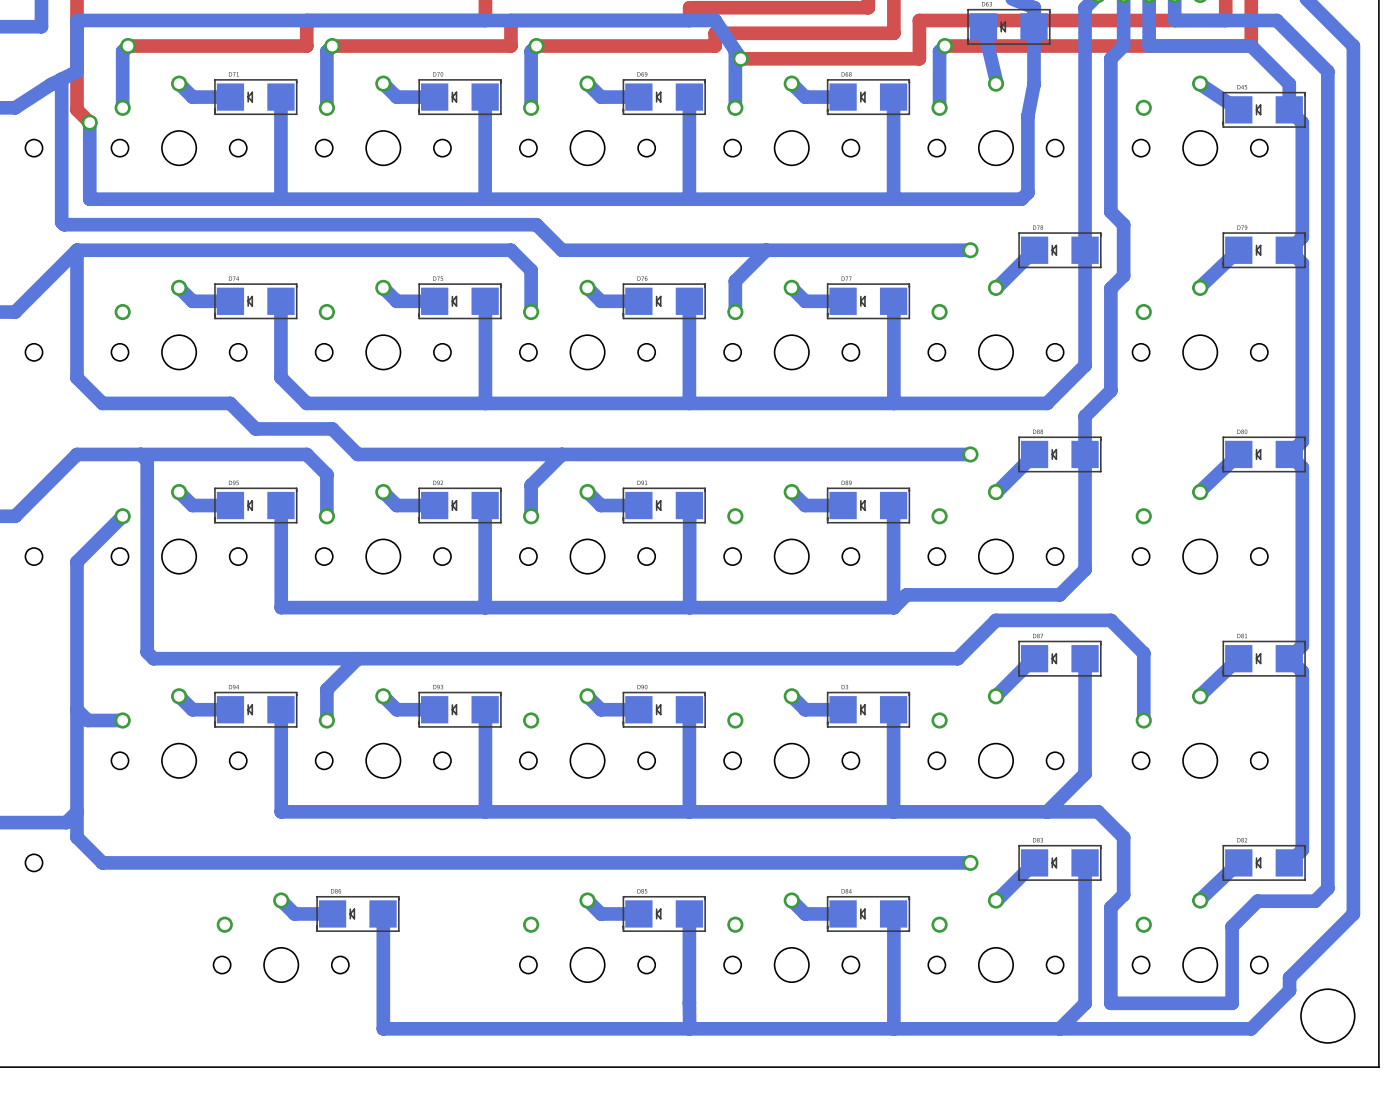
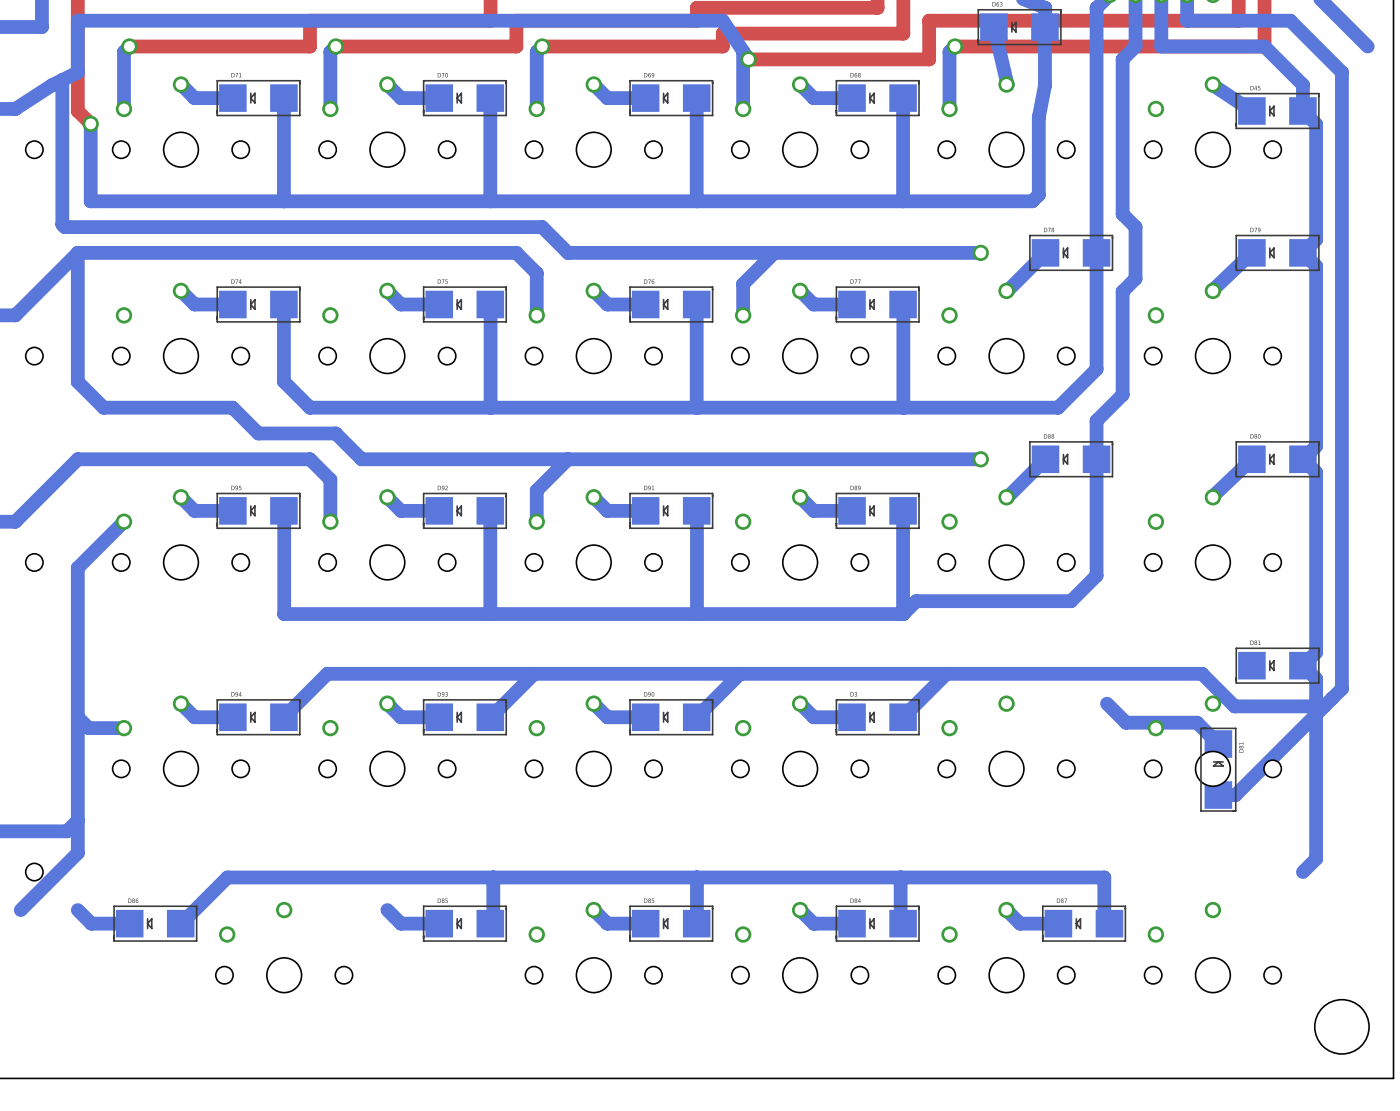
bottom track: (1353, 46) (1353, 913) (1289, 977) (1289, 990) (1251, 1028) (383, 1028) (383, 913) -> none
bottom track: (140, 454) (147, 460) (147, 652) (153, 658) (957, 658) (995, 620) (1110, 620) (1143, 653) (1143, 720) -> none
bottom track: (357, 658) (326, 689) (326, 720) -> none
bottom track: (1034, 658) (995, 696) -> none
part position: (1059, 658) -> (1084, 923)
bottom track: (1085, 658) (1085, 773) (1047, 811) -> none
bottom track: (1238, 658) (1200, 696) -> none
bottom track: (1327, 681) (1327, 888) (1315, 901) (1257, 901) (1232, 926) (1232, 1003) (1110, 1003) (1110, 907) (1123, 894) (1123, 837) (1098, 811) (281, 811) (281, 710) -> (1324, 706) (1234, 706) (1202, 673) (327, 673) (283, 717)
bottom track: none -> (1341, 688) (1235, 795) (1218, 795)
bottom track: none -> (1107, 703) (1126, 722) (1197, 722) (1218, 744)
bottom track: (689, 709) (689, 811) -> (696, 717) (740, 673)
bottom track: (893, 709) (893, 811) -> (903, 717) (946, 673)
bottom track: (485, 710) (485, 811) -> (490, 717) (534, 673)
part: none -> (1218, 769)
bottom track: (77, 837) (102, 862) (970, 862) -> (77, 846) (77, 853) (20, 910)
via: (970, 862) -> none
bottom track: (1034, 862) (995, 900) -> (1058, 923) (1020, 923) (1006, 910)
part: (1059, 862) -> none
bottom track: (1085, 862) (1085, 1003) (1059, 1028) -> none
bottom track: (1238, 862) (1199, 900) -> none
part: (1264, 862) -> none
bottom track: none -> (493, 877) (493, 920) (490, 923)
bottom track: none -> (77, 910) (91, 923) (129, 923)
bottom track: (281, 900) (294, 913) (332, 913) -> (387, 910) (400, 923) (439, 923)
part position: (357, 913) -> (155, 923)
part: none -> (464, 923)
bottom track: (689, 913) (689, 1028) -> (696, 923) (696, 877)
bottom track: (893, 913) (893, 1028) -> (903, 923) (900, 921) (900, 877)
bottom track: none -> (181, 923) (227, 877) (1104, 877) (1104, 926)

